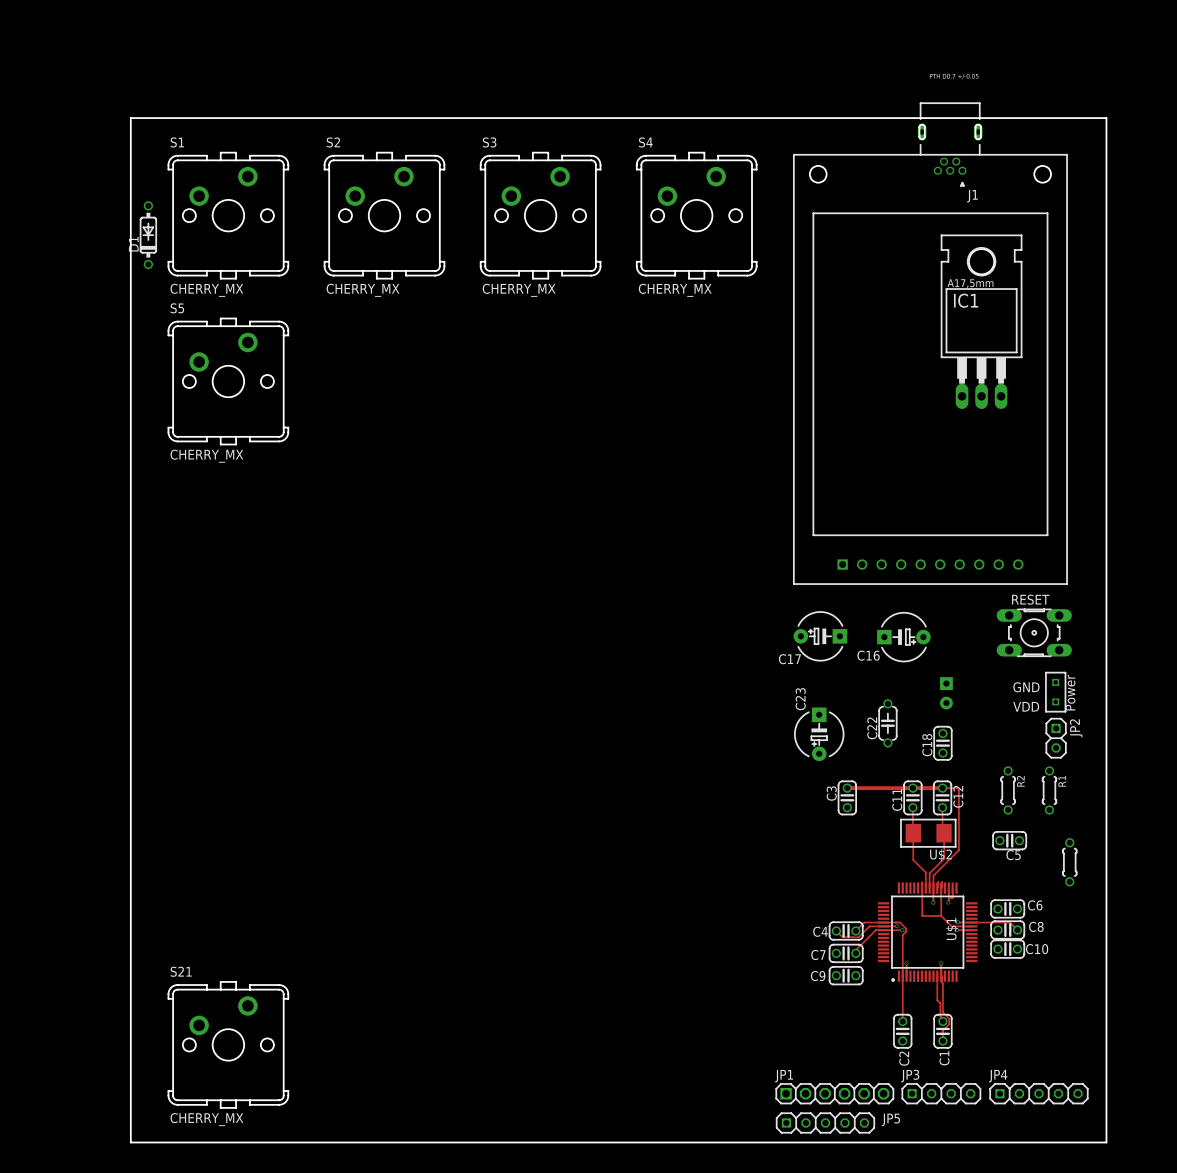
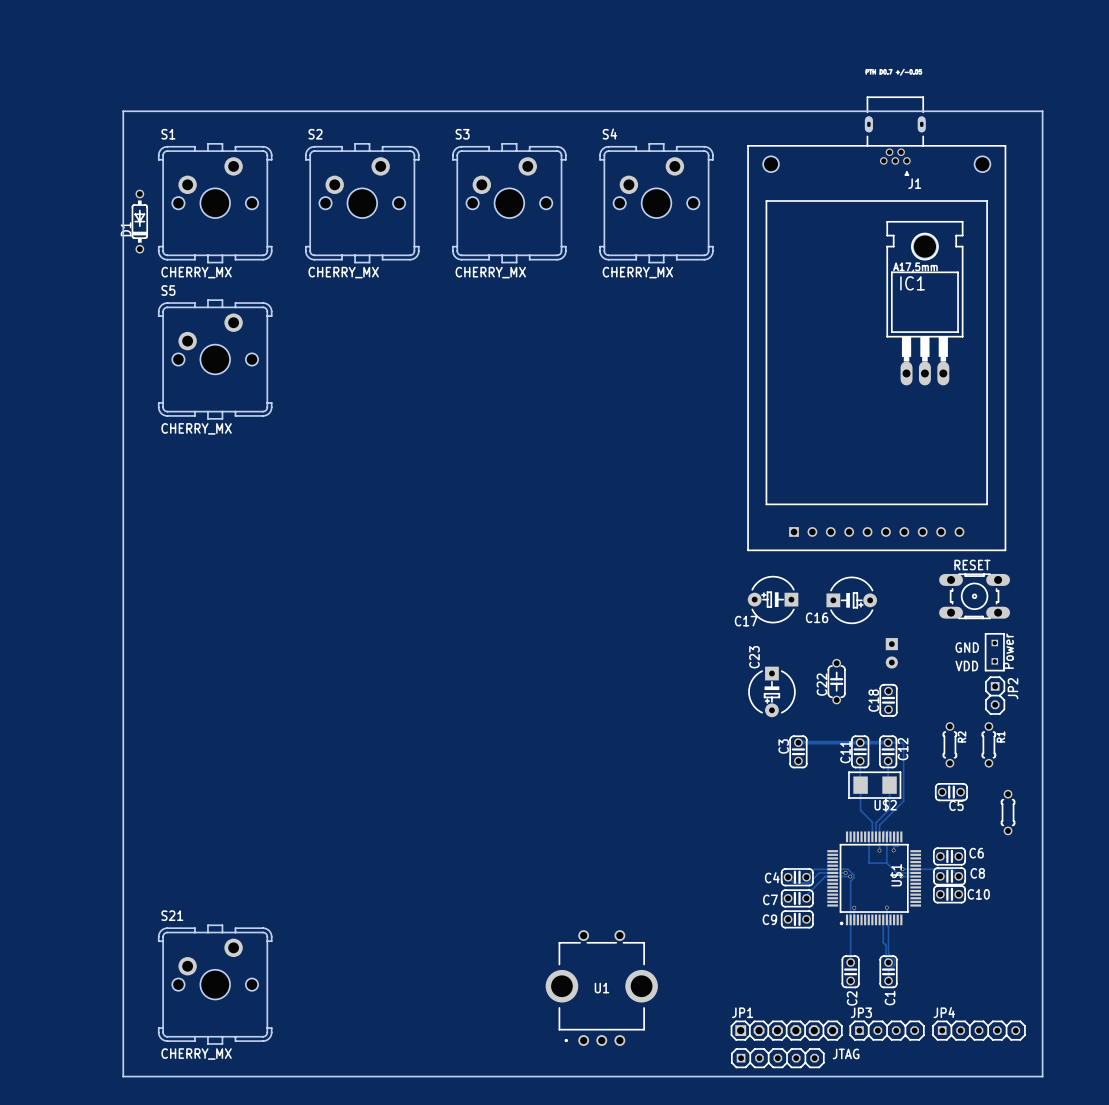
U1: none -> (601, 988)
JP5 name: JP5 (891, 1119) -> JTAG (846, 1053)

